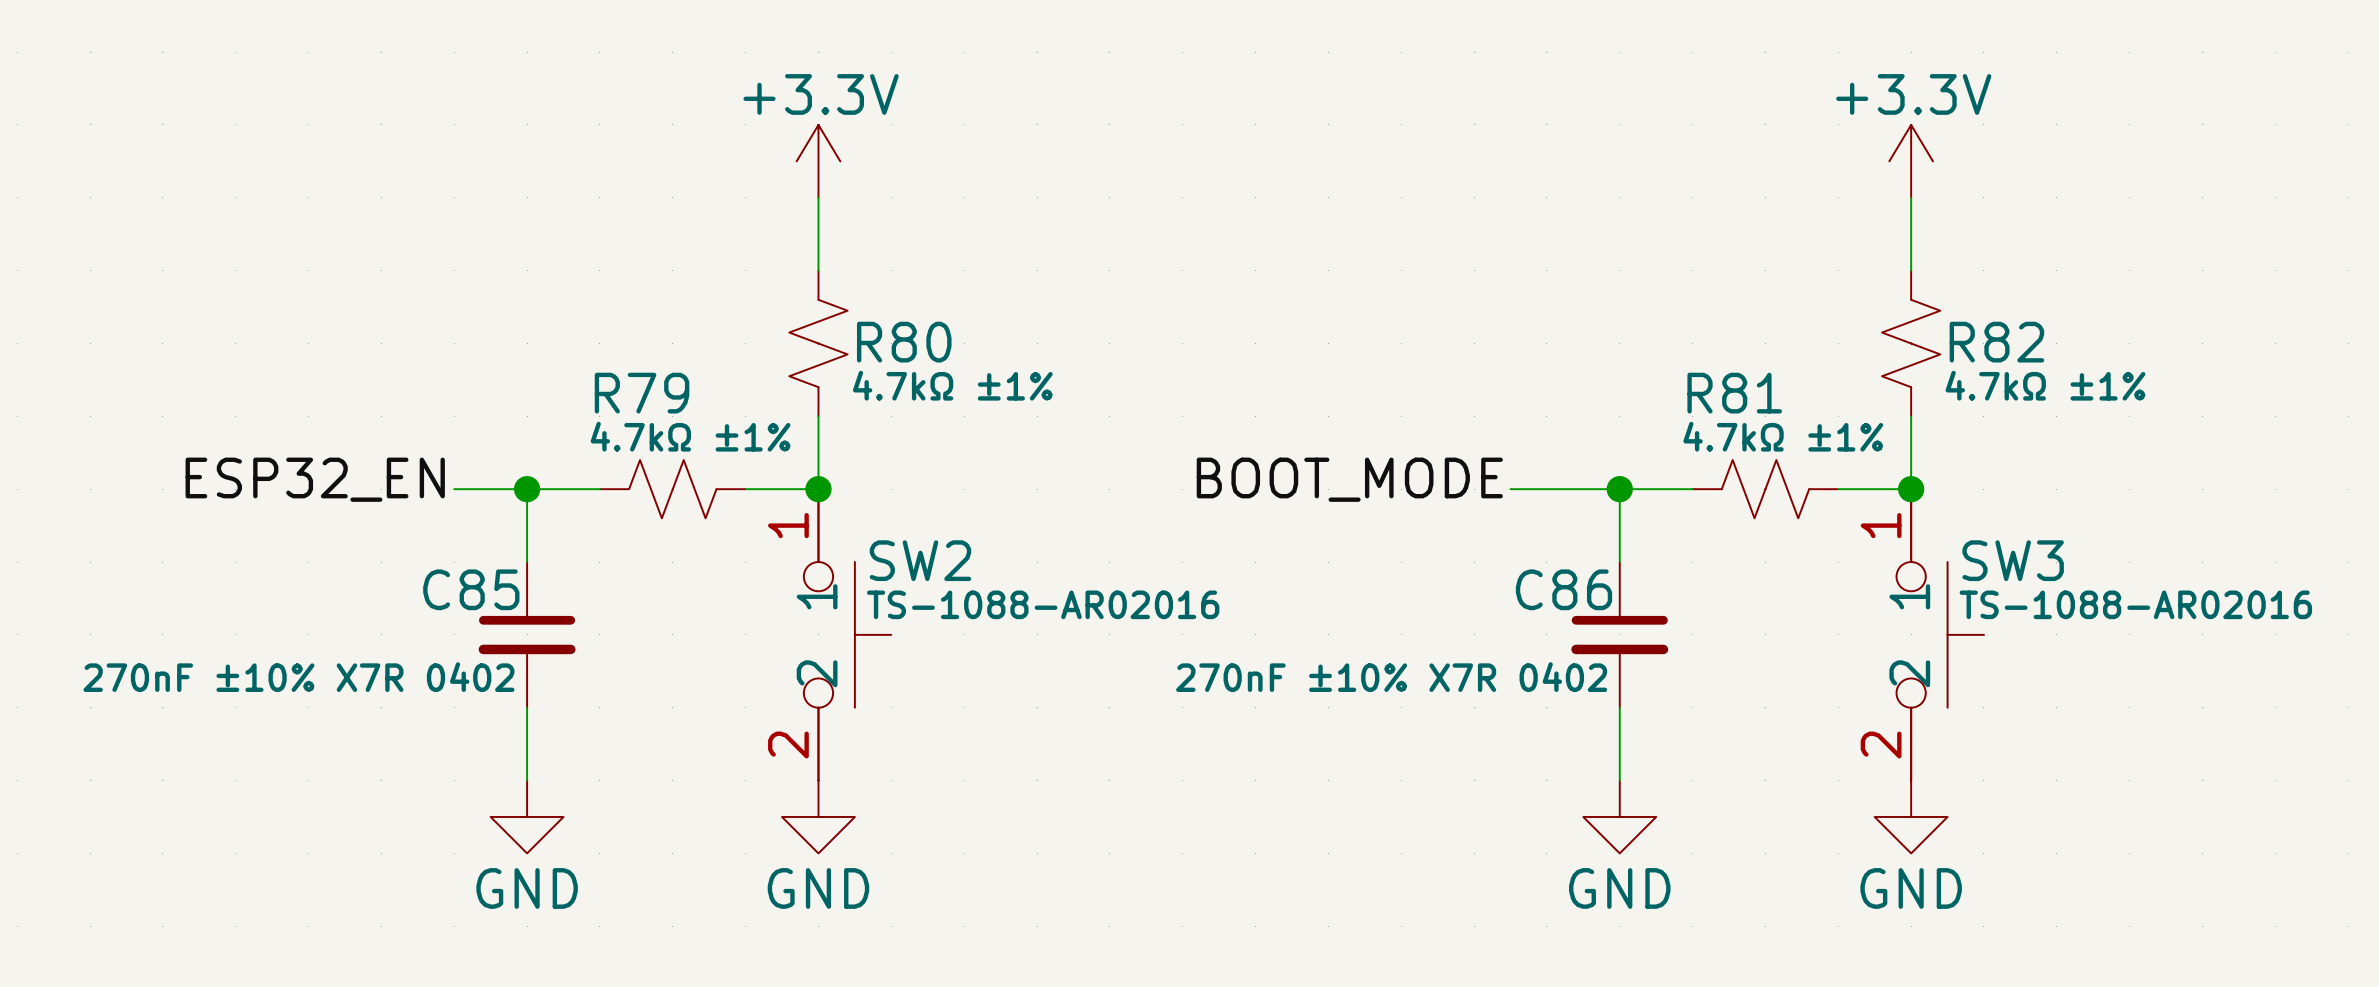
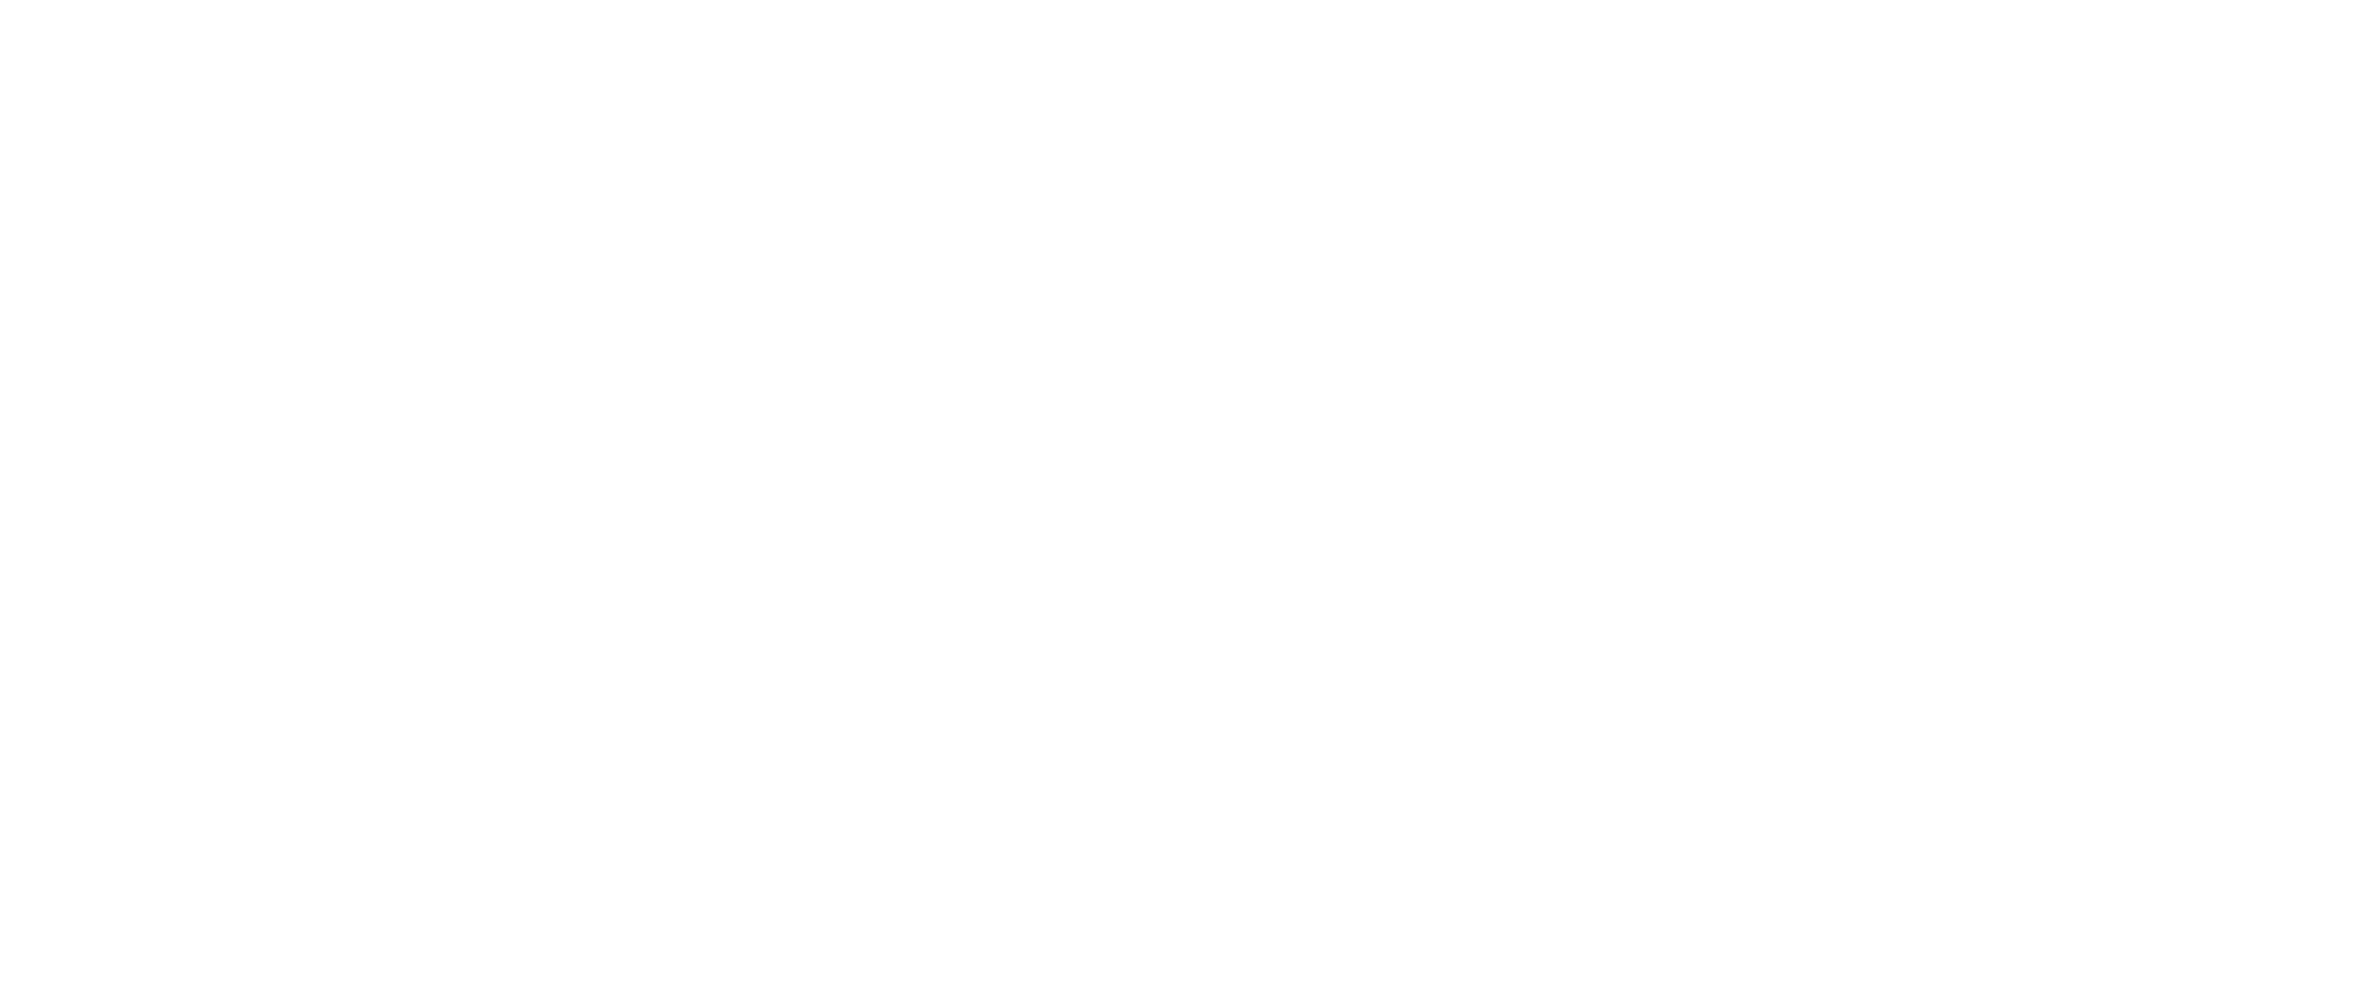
power symbol: +3.3V (818, 161) -> none
power symbol: +3.3V (1911, 161) -> none
wire: (818, 197) (818, 270) -> none
wire: (1911, 197) (1911, 270) -> none
R80: 4.7kΩ ±1% (818, 343) -> none
R82: 4.7kΩ ±1% (1911, 343) -> none
wire: (818, 416) (818, 489) (745, 489) -> none
wire: (1911, 416) (1911, 489) (1838, 489) -> none
label: ESP32_EN (315, 479) -> none
label: BOOT_MODE (1349, 479) -> none
wire: (454, 489) (599, 489) -> none
wire: (527, 489) (527, 562) -> none
junction: (527, 489) -> none
R79: 4.7kΩ ±1% (672, 489) -> none
junction: (818, 489) -> none
wire: (1510, 489) (1692, 489) -> none
wire: (1619, 489) (1619, 562) -> none
junction: (1619, 489) -> none
R81: 4.7kΩ ±1% (1765, 489) -> none
junction: (1911, 489) -> none
C85: 270nF ±10% X7R 0402 (527, 634) -> none
SW2: TS-1088-AR02016 (847, 634) -> none
C86: 270nF ±10% X7R 0402 (1619, 634) -> none
SW3: TS-1088-AR02016 (1940, 634) -> none
wire: (527, 707) (527, 780) -> none
wire: (1619, 707) (1619, 780) -> none
power symbol: GND (527, 816) -> none
power symbol: GND (818, 816) -> none
power symbol: GND (1619, 816) -> none
power symbol: GND (1911, 816) -> none

